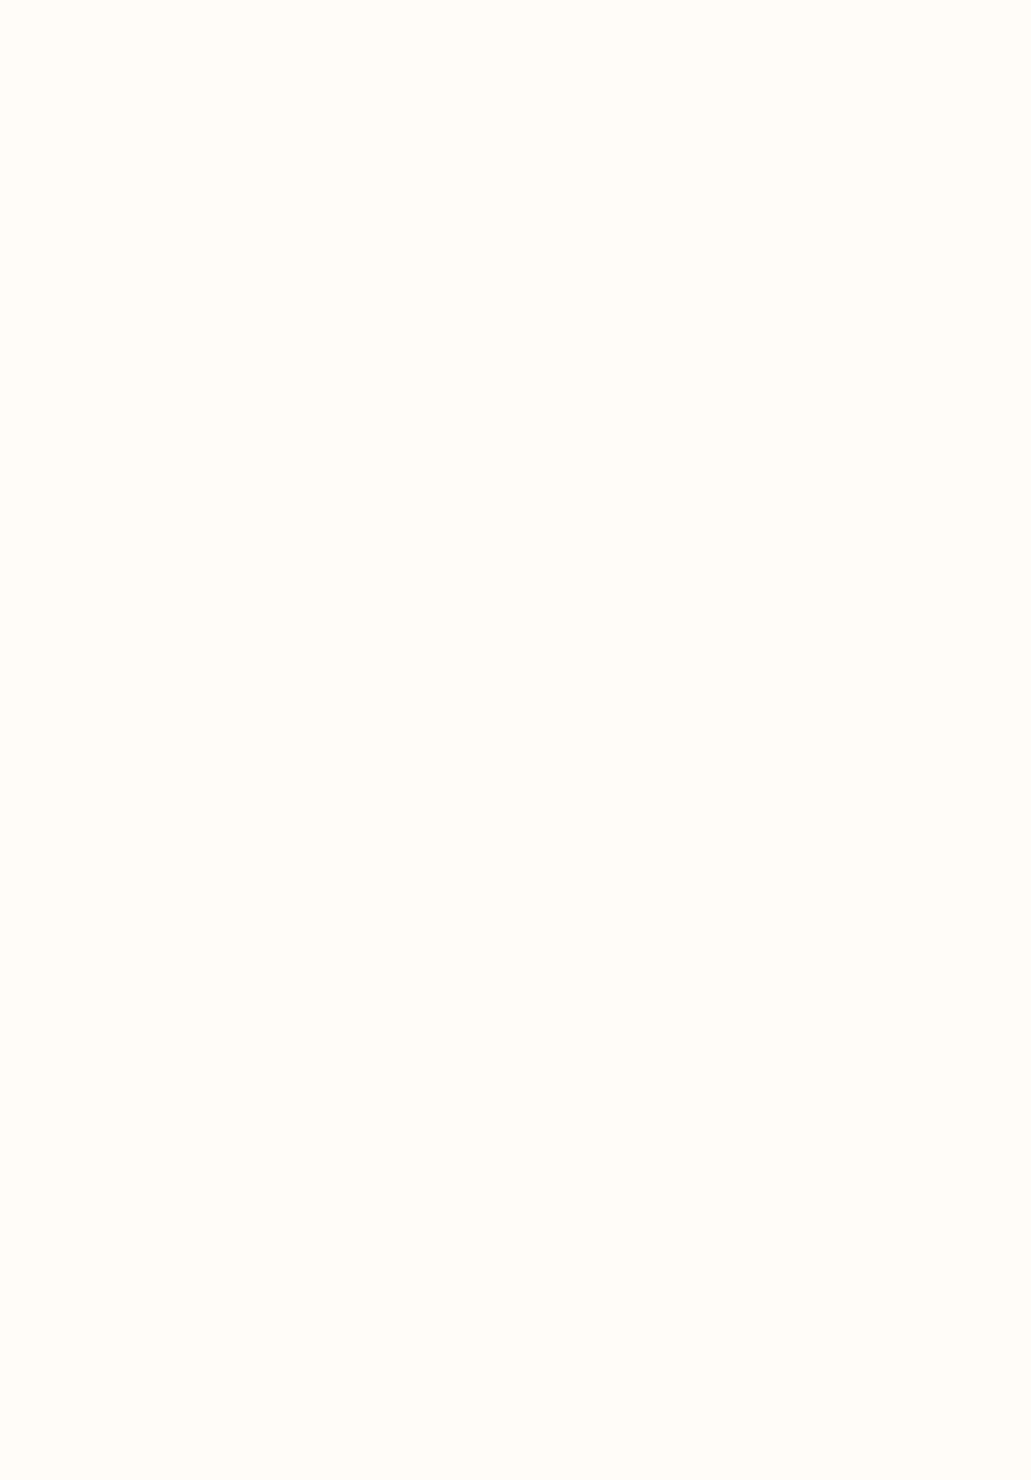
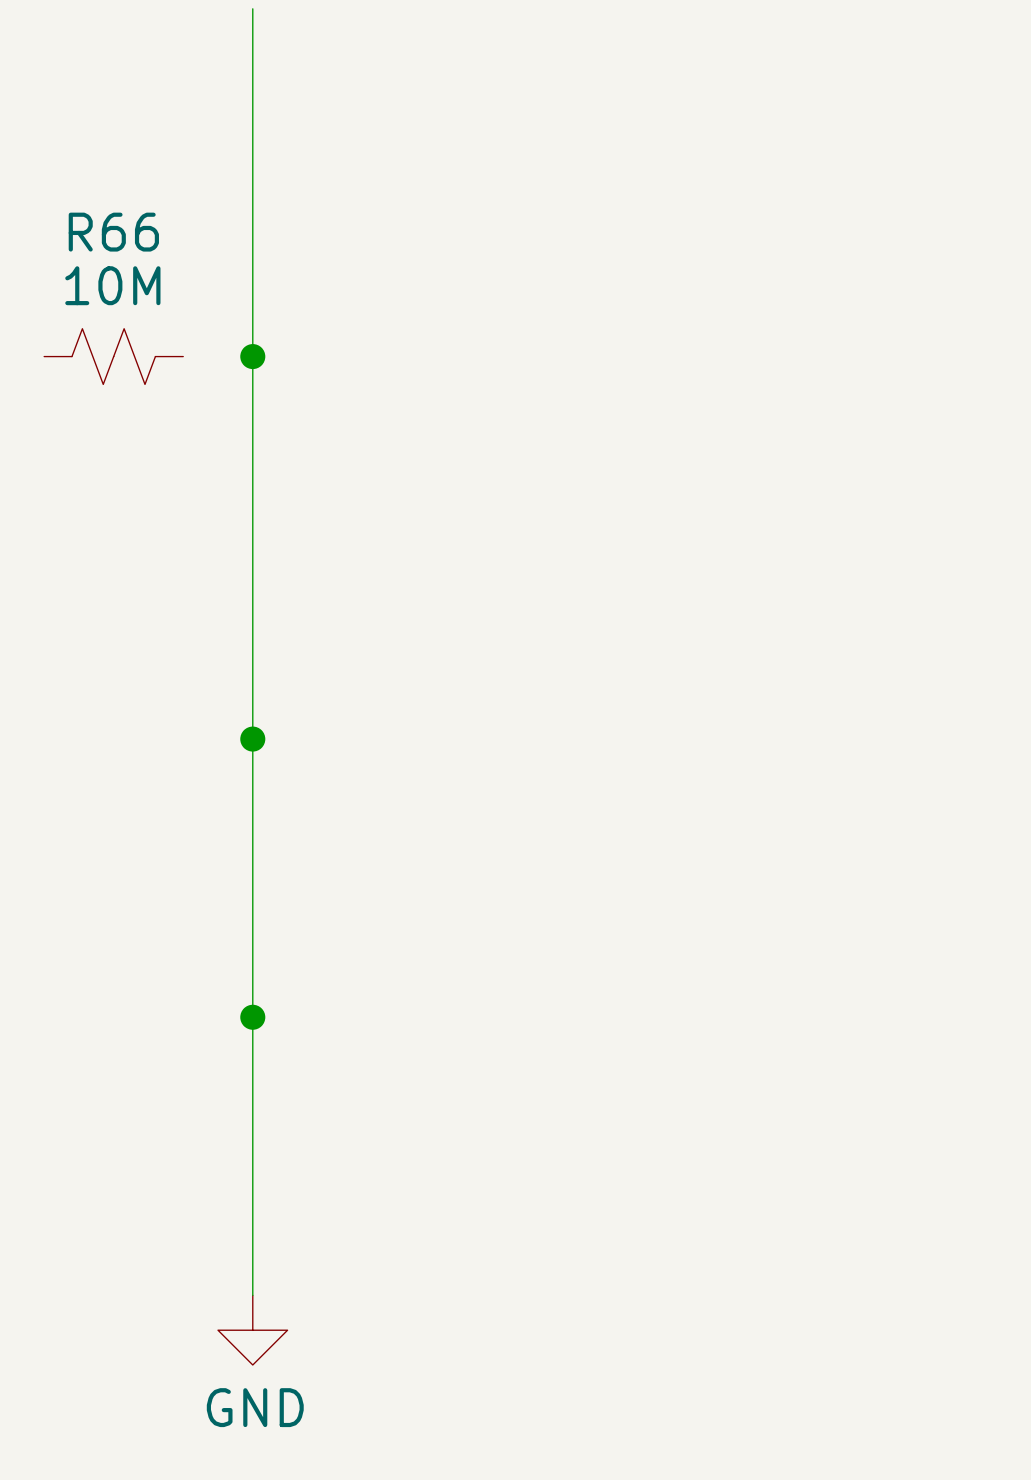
wire: none -> (252, 8) (252, 1295)
R66: none -> 10M (113, 356)
junction: none -> (252, 356)
junction: none -> (252, 739)
junction: none -> (252, 1017)
power symbol: none -> GND (252, 1330)

